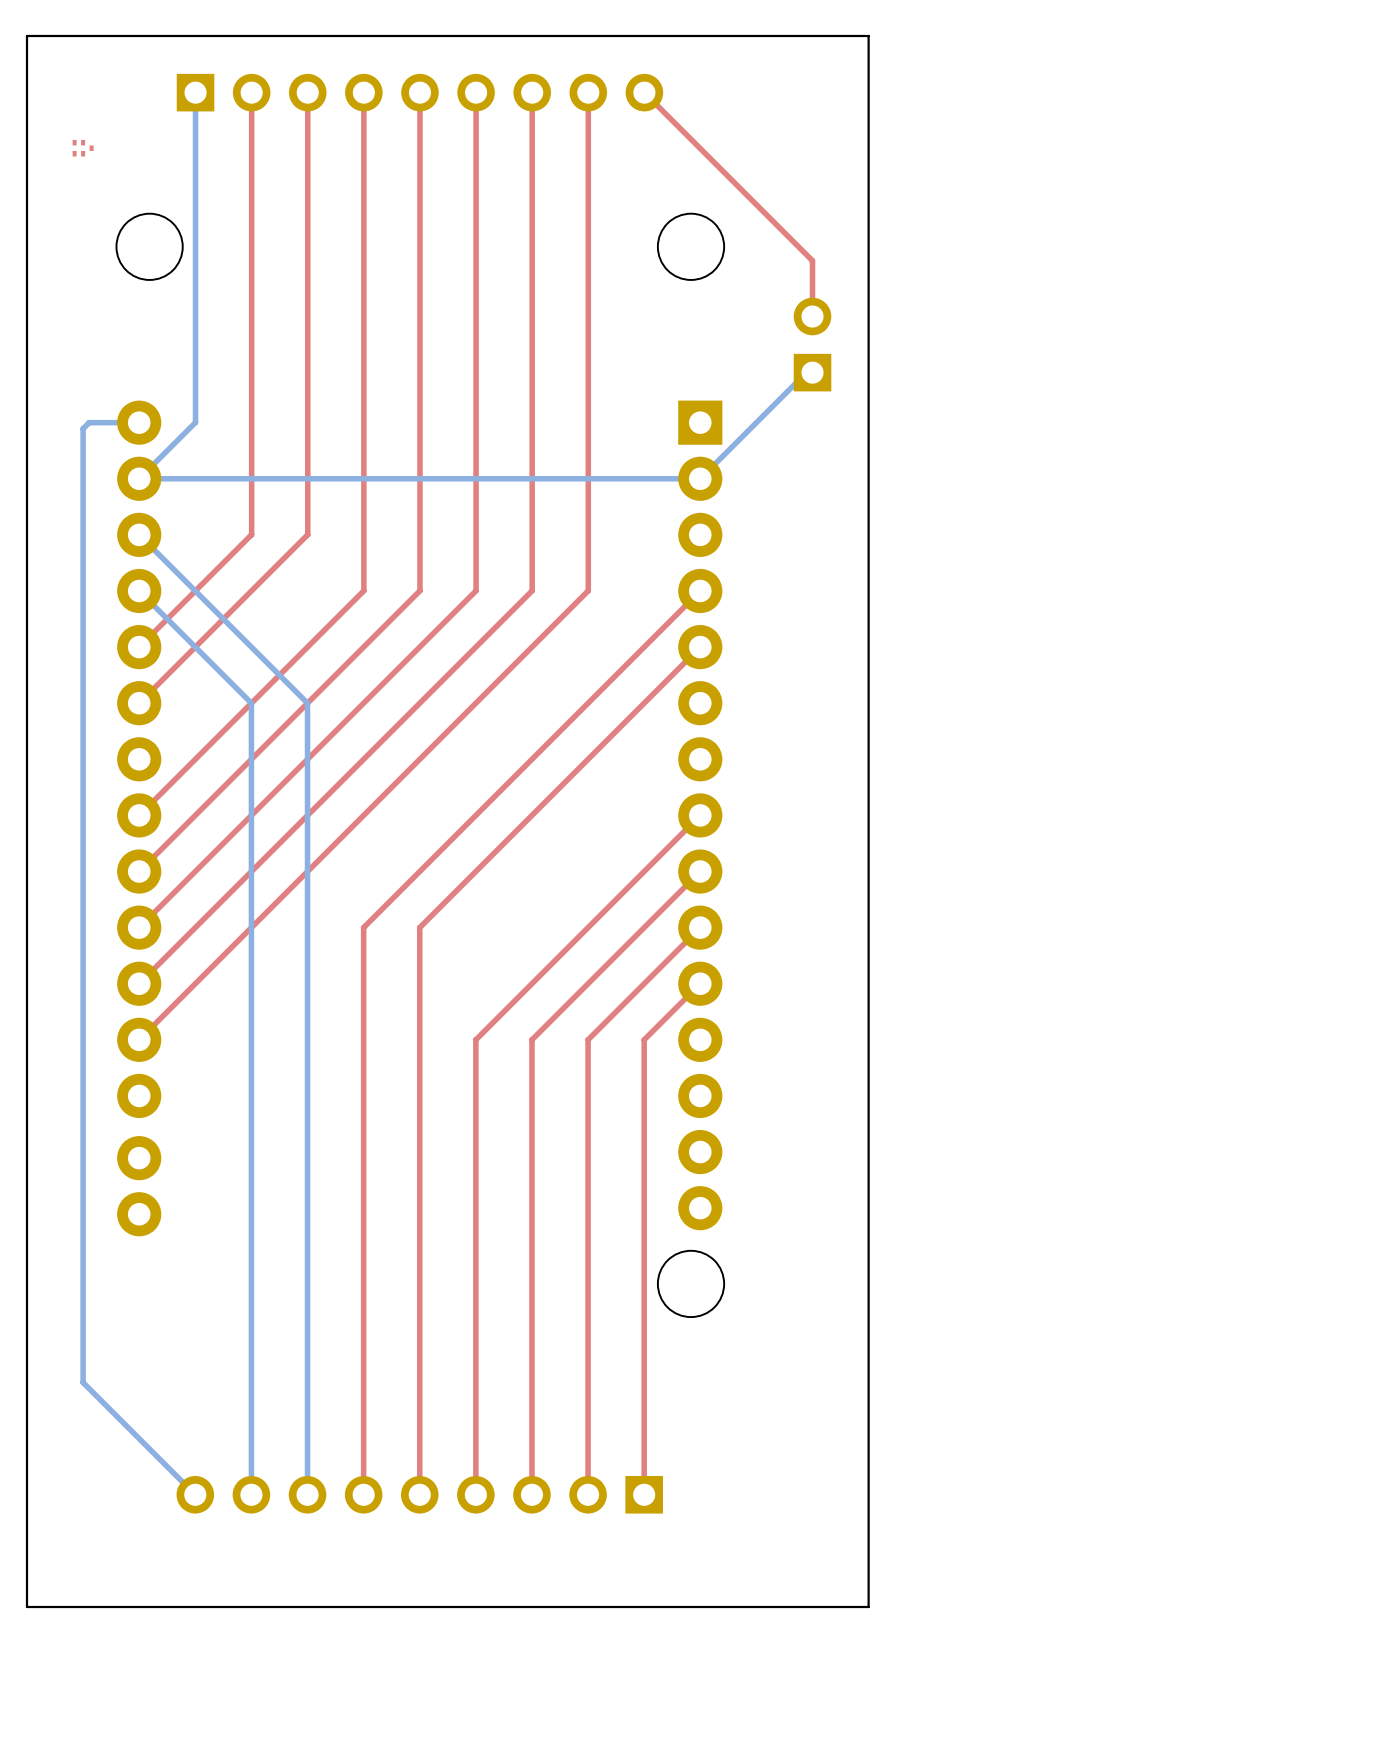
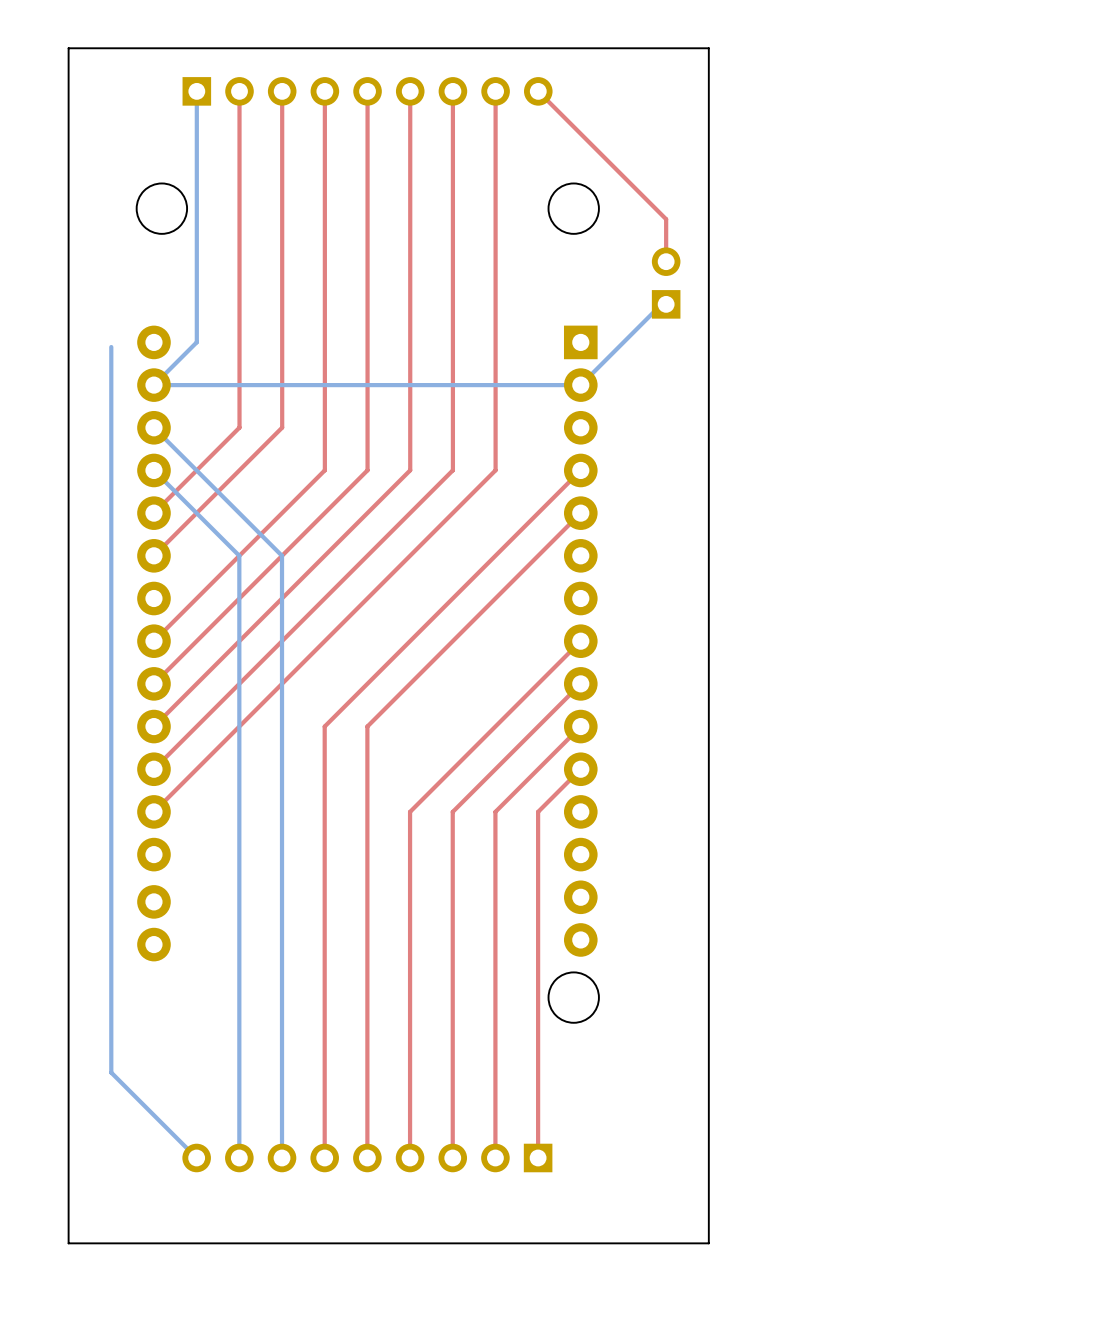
part: (83, 148) -> none
bottom track: (139, 422) (89, 422) (83, 428) -> none

